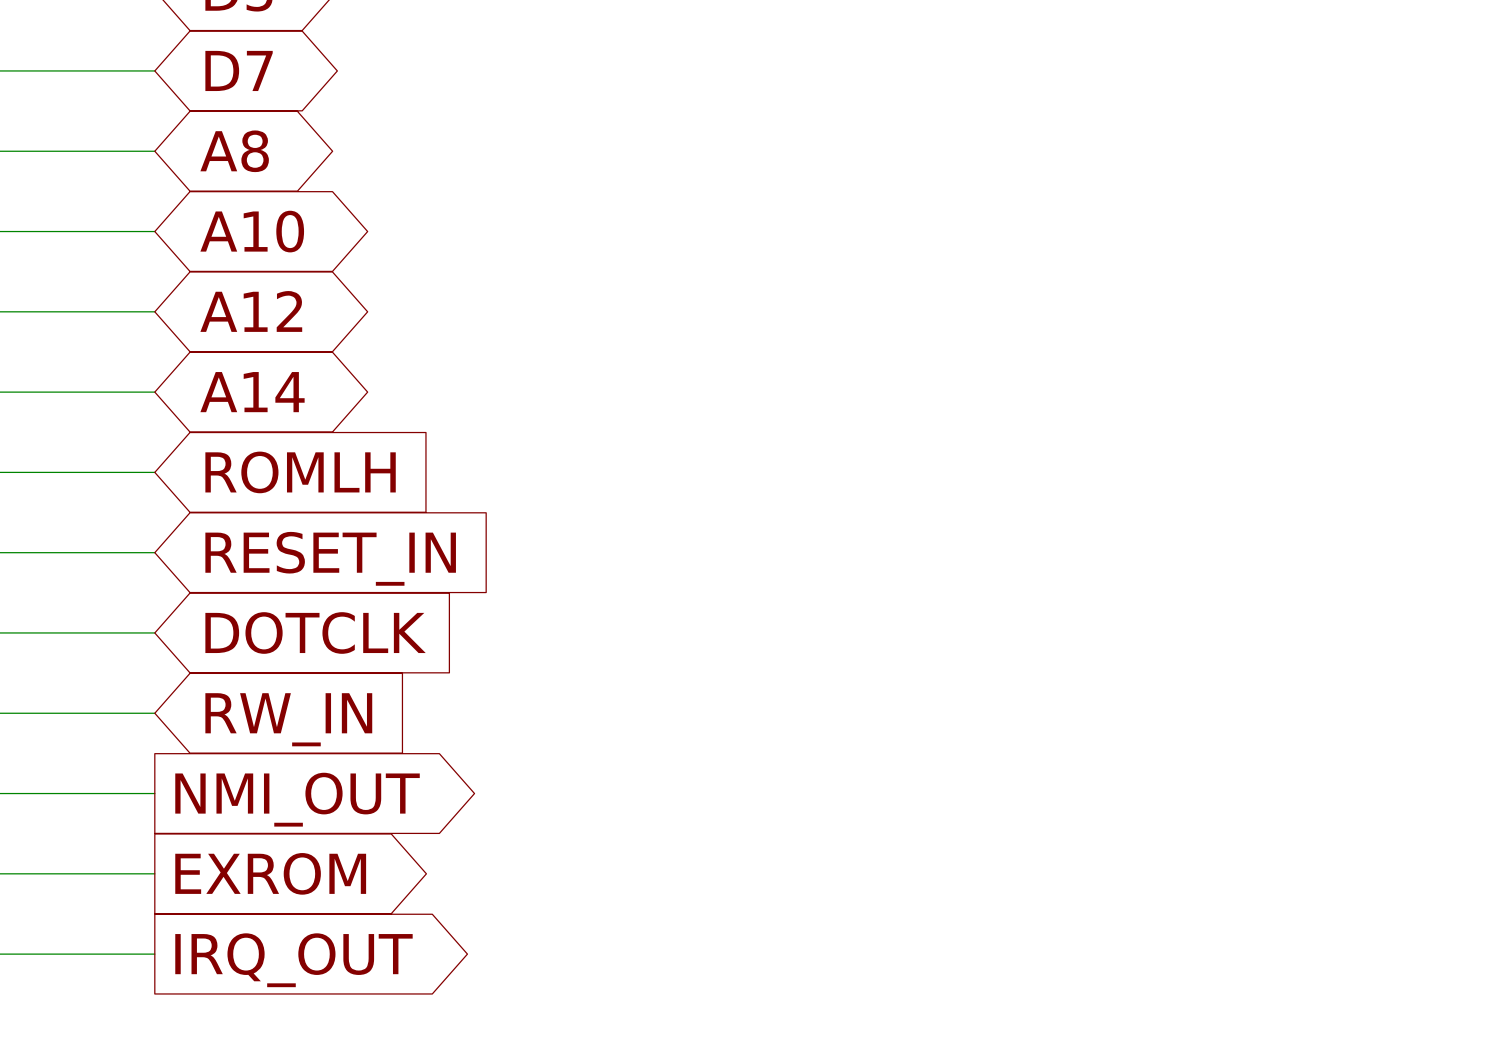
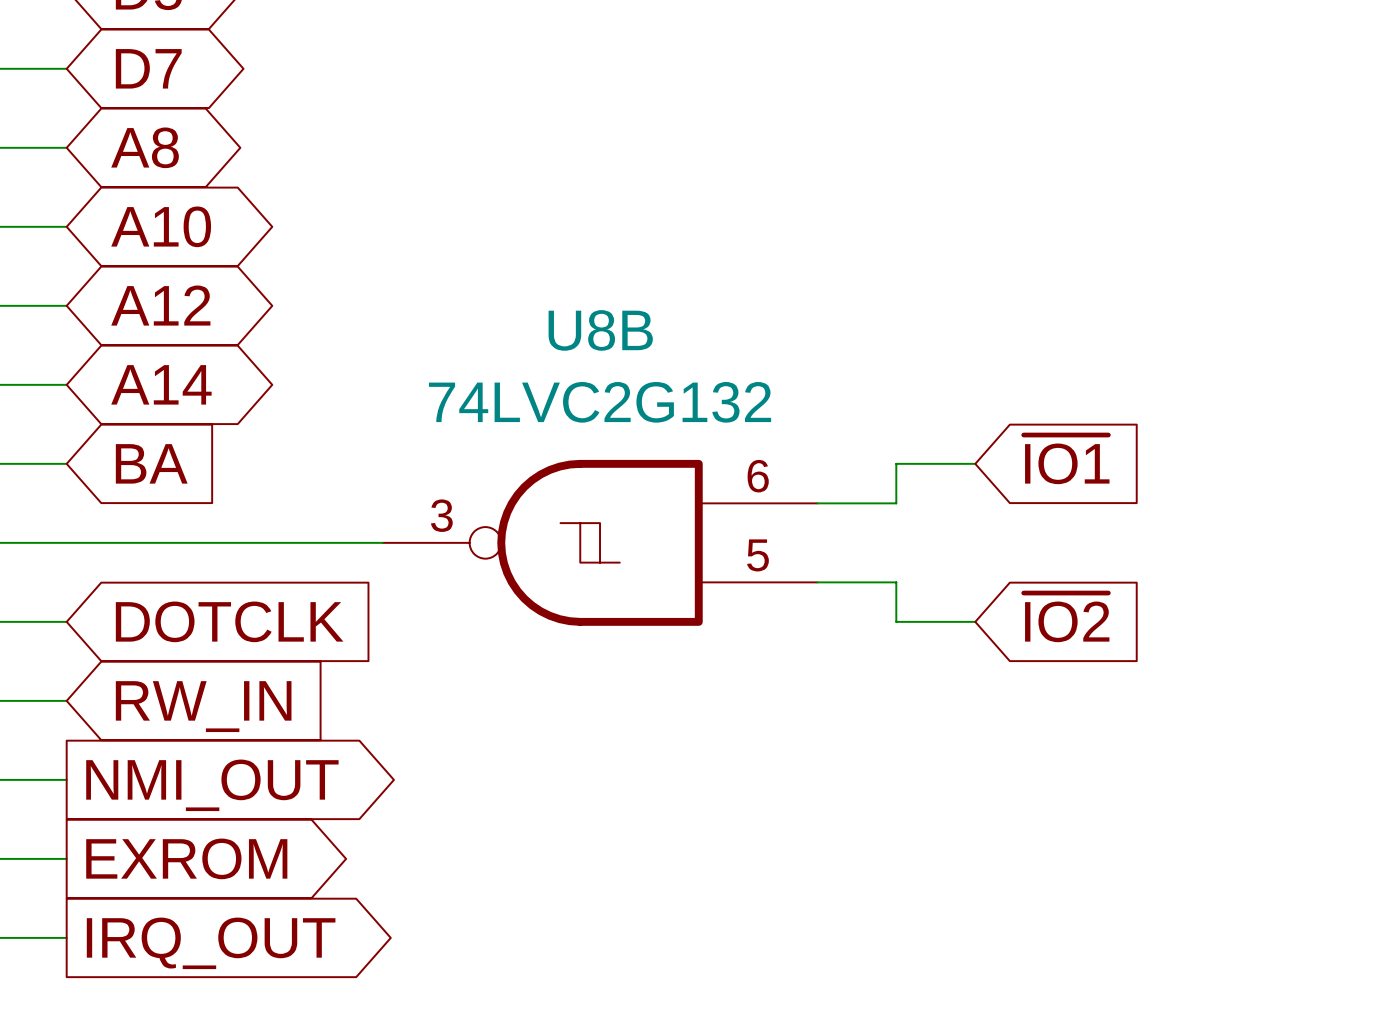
global label: none -> ~{IO1} (1066, 459)
global label: ROMLH (300, 472) -> BA (151, 463)
wire: none -> (975, 463) (896, 463) (896, 503) (817, 503)
wire: none -> (66, 542) (382, 542)
U8B: none -> 74LVC2G132 (600, 542)
global label: RESET_IN (330, 558) -> none
wire: none -> (817, 582) (896, 582) (896, 621) (975, 621)
global label: none -> ~{IO2} (1066, 617)

